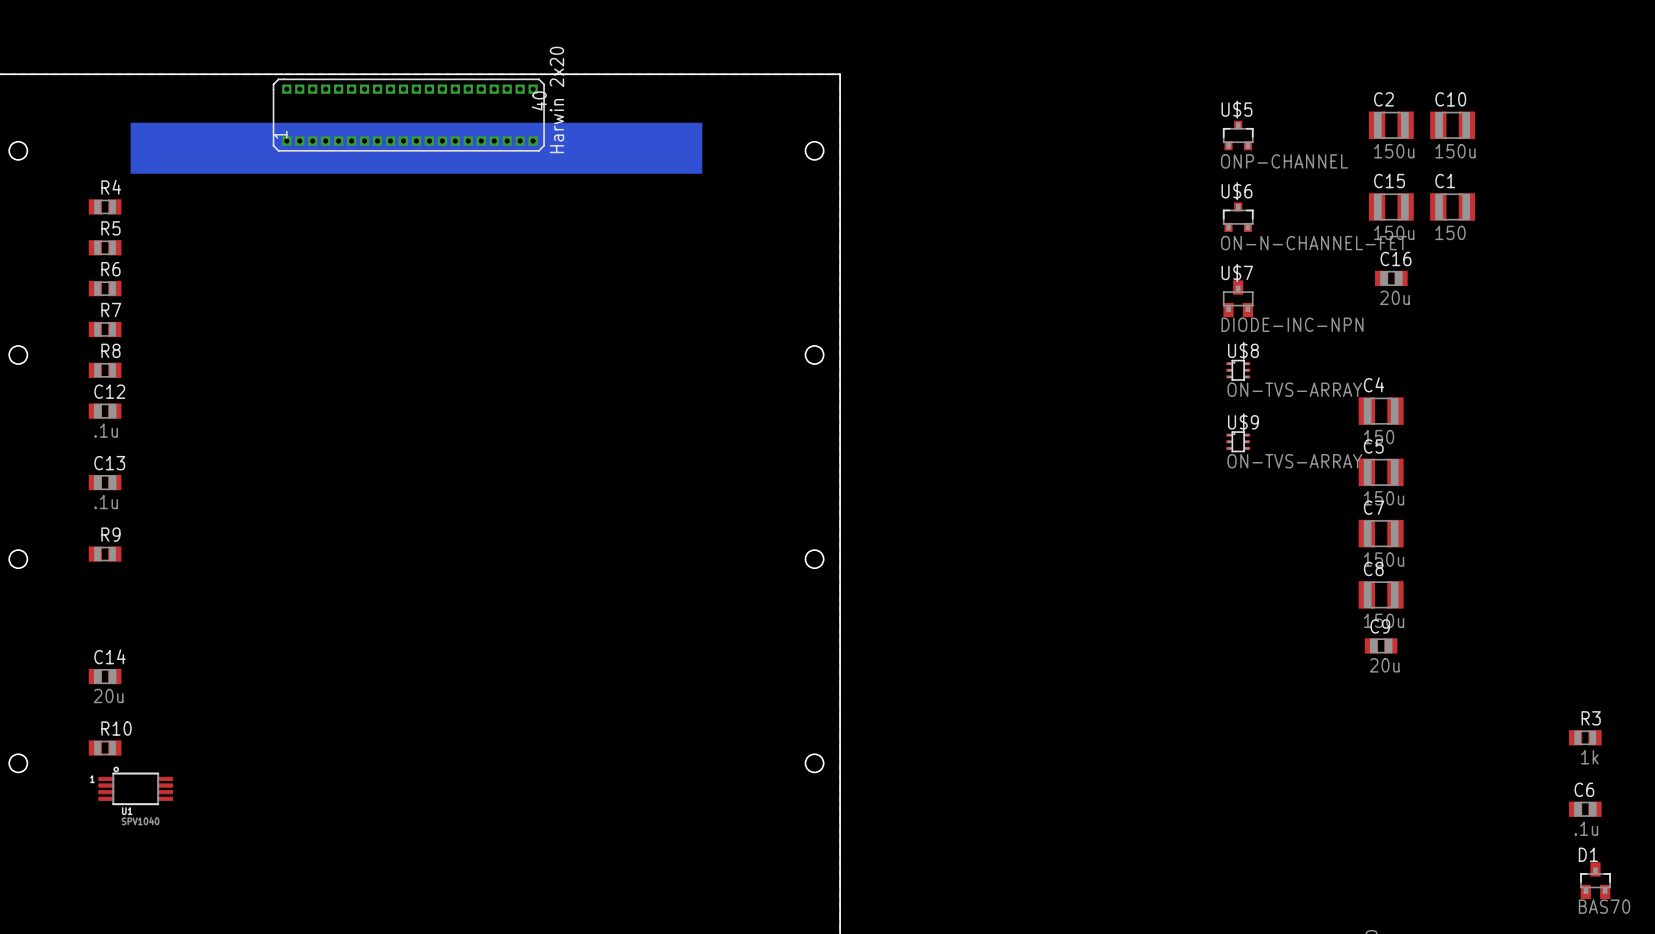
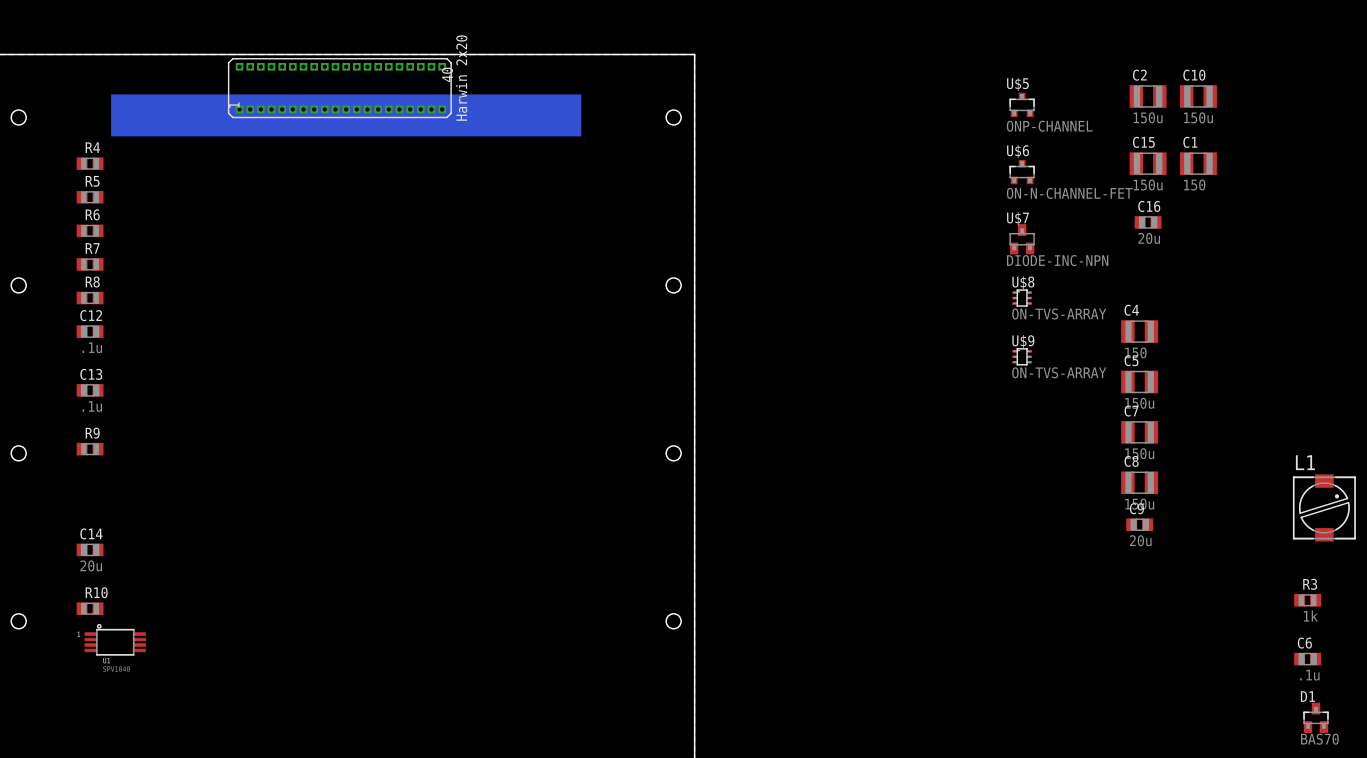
L1: none -> (1324, 507)

